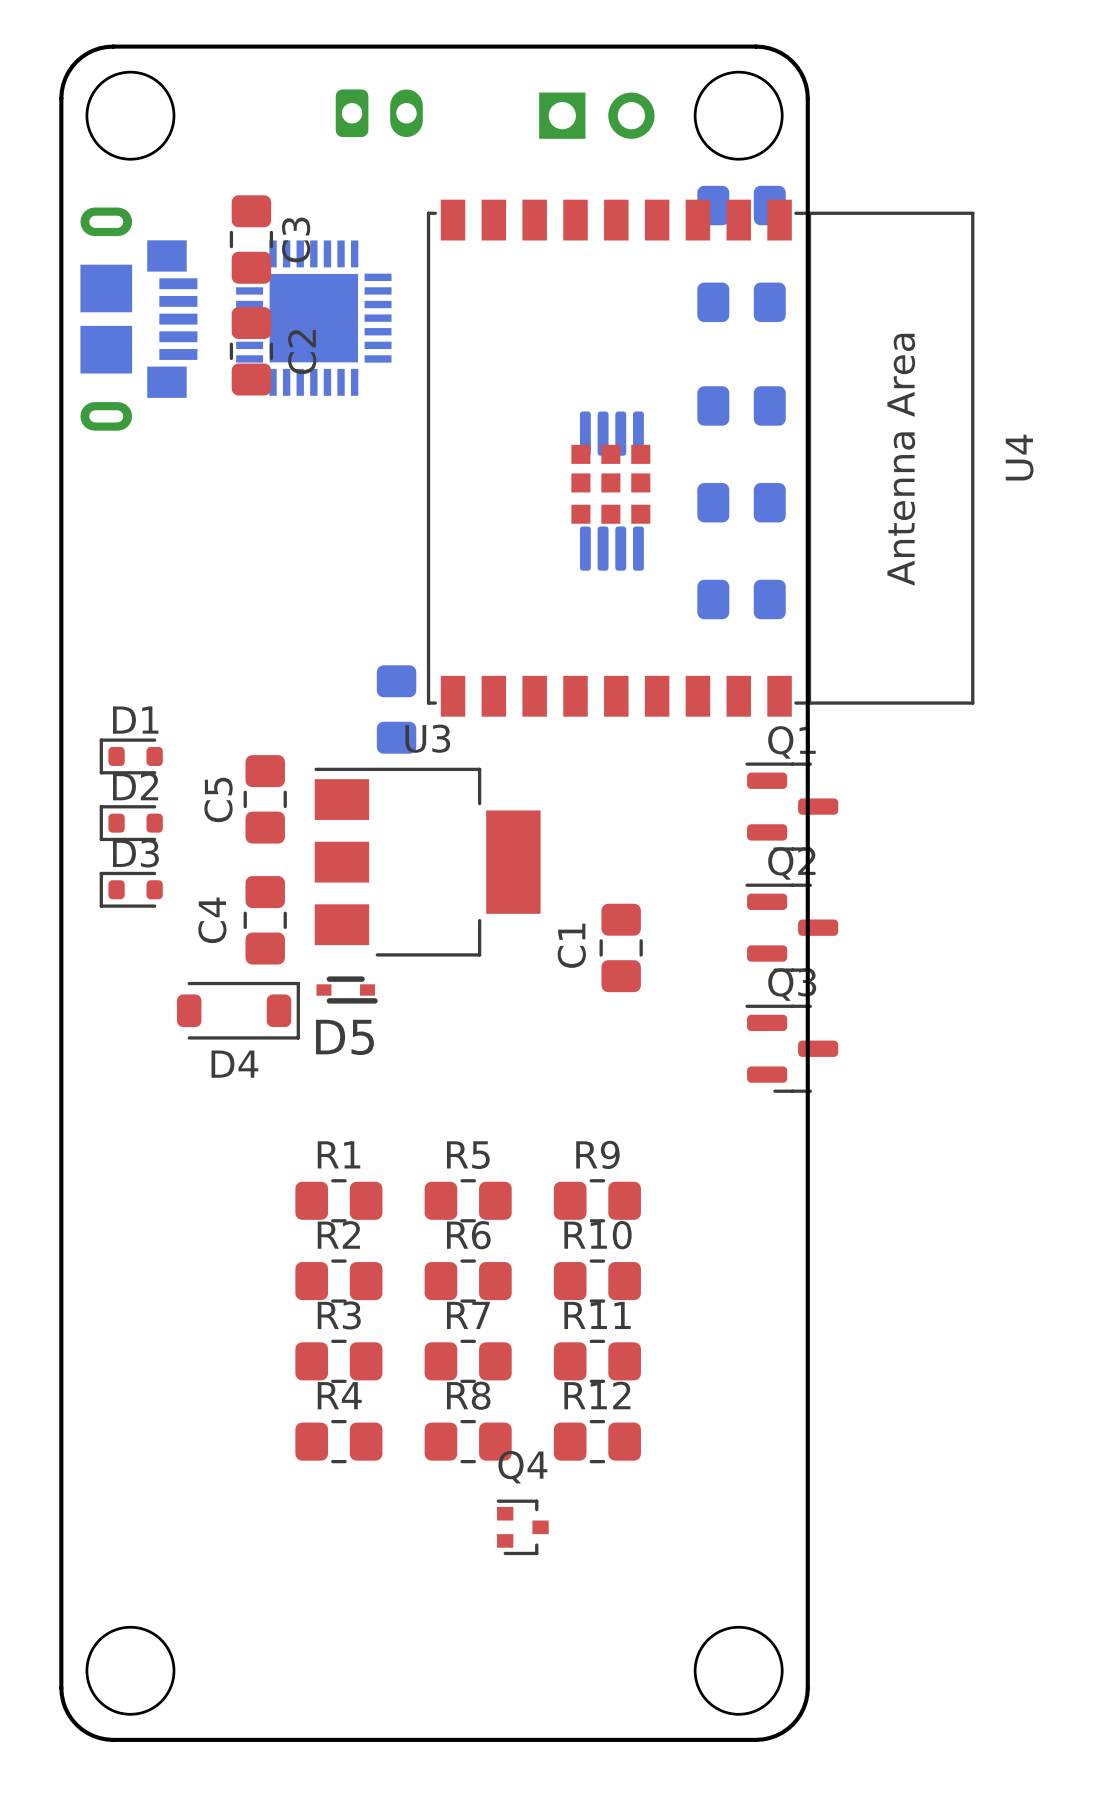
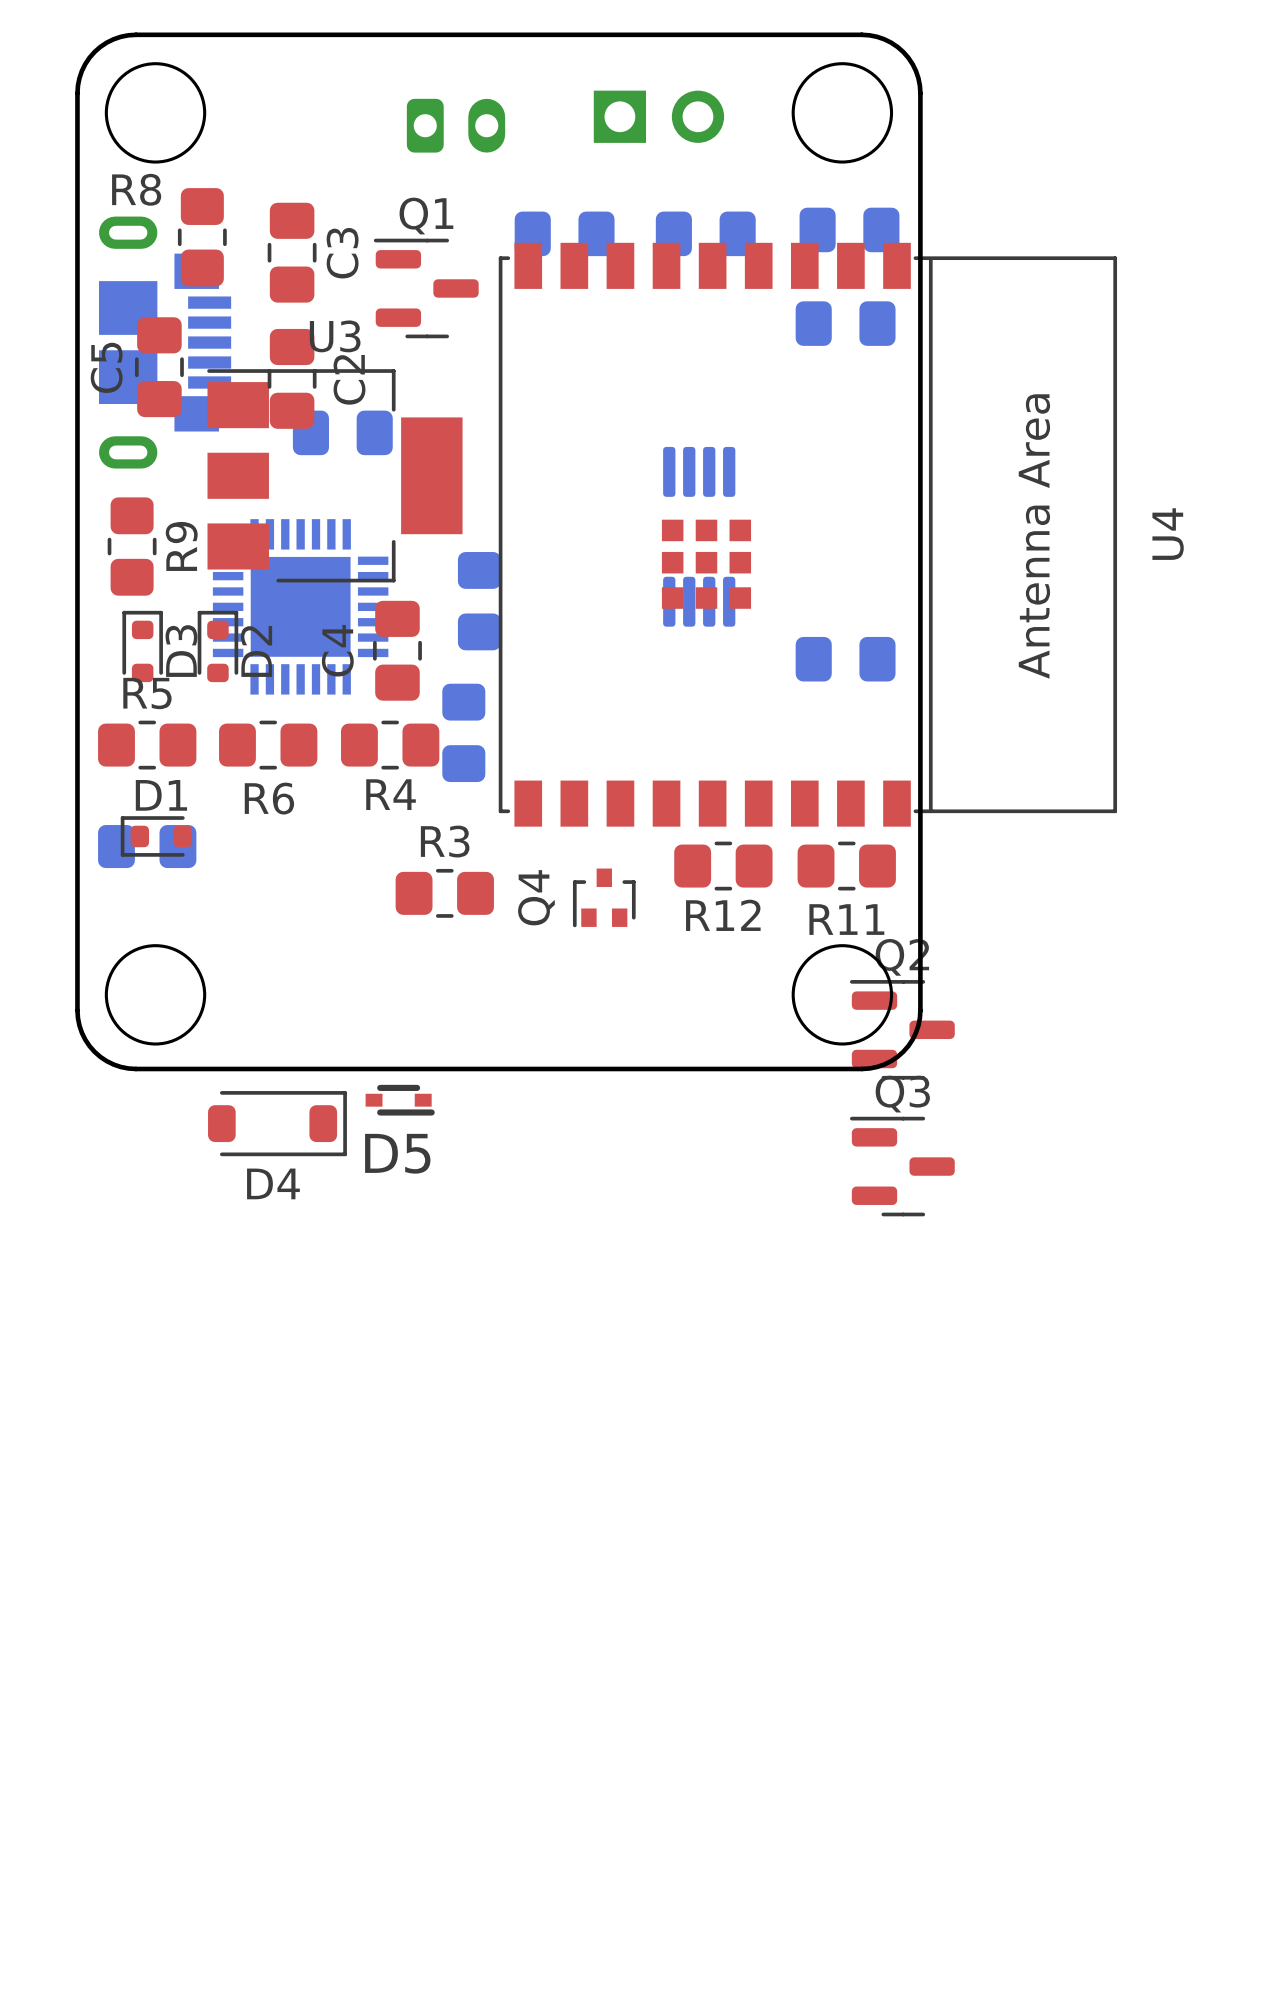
part position: (379, 113) -> (456, 125)
part position: (596, 115) -> (658, 116)
part position: (741, 205) -> (849, 229)
part: none -> (564, 233)
part: none -> (705, 233)
part position: (313, 318) -> (300, 606)
part: (741, 405) -> none
U4 position: (700, 458) -> (807, 534)
part: (741, 502) -> none
part: none -> (479, 601)
part: (396, 709) -> none
part: none -> (147, 846)
C5 position: (265, 799) -> (159, 367)
Q1 position: (791, 806) -> (426, 288)
D2 rotation: 0° (131, 823) -> 90° clockwise (217, 646)
D2 position: (131, 823) -> (217, 646)
round board edge: none -> [104, 944, 207, 1046]
round board edge: none -> [791, 944, 894, 1046]
U3 position: (427, 862) -> (334, 475)
D3 rotation: 0° (131, 889) -> 90° clockwise (142, 646)
D3 position: (131, 889) -> (142, 646)
board edge: (61, 910) (61, 1688) (65, 1707) (76, 1724) (93, 1735) (113, 1739) (755, 1739) (769, 1738) (781, 1732) (797, 1719) (806, 1701) (807, 1688) (807, 910) -> (77, 1010) (81, 1032) (94, 1051) (113, 1064) (136, 1068) (869, 1068) (884, 1064) (903, 1051) (915, 1032) (920, 1010)
C4 position: (265, 920) -> (397, 650)
C1 side: top (621, 947) -> bottom (342, 432)
R1 side: top (338, 1200) -> bottom (463, 732)
R5 position: (468, 1200) -> (147, 745)
R9 rotation: 0° (597, 1200) -> 90° clockwise (132, 546)
R9 position: (597, 1200) -> (132, 546)
R6 name position: R6 (468, 1235) -> R6 (269, 798)
R2: (338, 1281) -> none
R6 position: (468, 1281) -> (268, 745)
R10: (597, 1281) -> none
R11 name position: R11 (597, 1315) -> R11 (846, 919)
R3 position: (338, 1361) -> (444, 893)
R7: (468, 1361) -> none
R11 position: (597, 1361) -> (846, 866)
R4 name position: R4 (339, 1395) -> R4 (391, 794)
R8 name position: R8 (468, 1395) -> R8 (136, 189)
R12 name position: R12 (597, 1395) -> R12 (723, 915)
R4 position: (338, 1441) -> (390, 745)
R8 rotation: 0° (468, 1441) -> 90° clockwise (202, 237)
R8 position: (468, 1441) -> (202, 237)
R12 position: (597, 1441) -> (723, 866)
Q4 rotation: 0° (522, 1527) -> 90° counterclockwise (604, 897)
Q4 position: (522, 1527) -> (604, 897)
round board edge: [85, 1625, 176, 1716] -> none
round board edge: [693, 1625, 784, 1716] -> none

